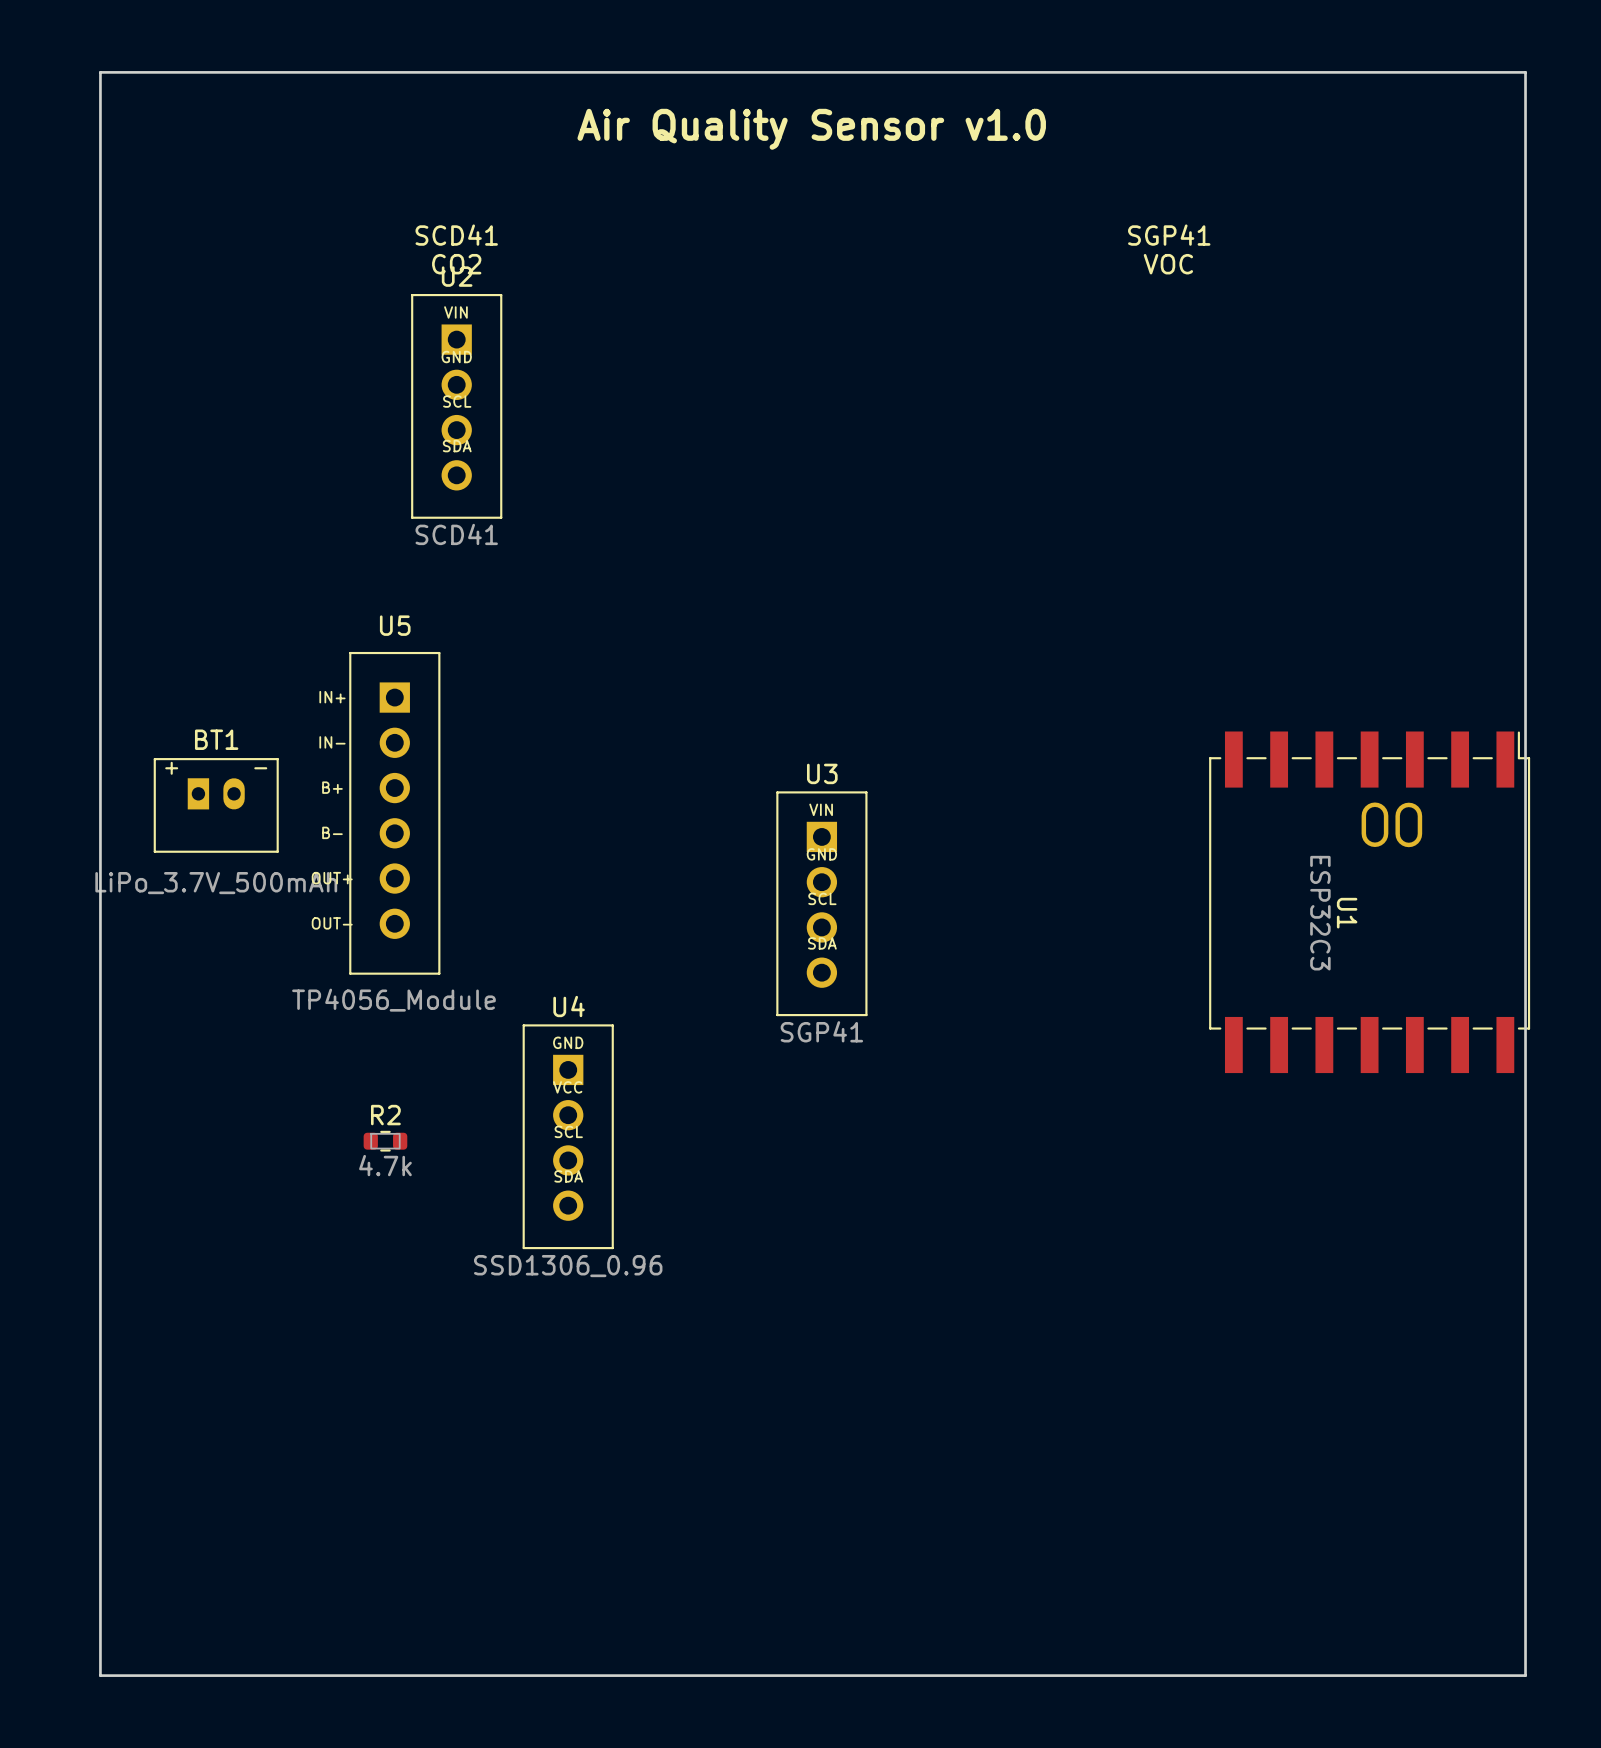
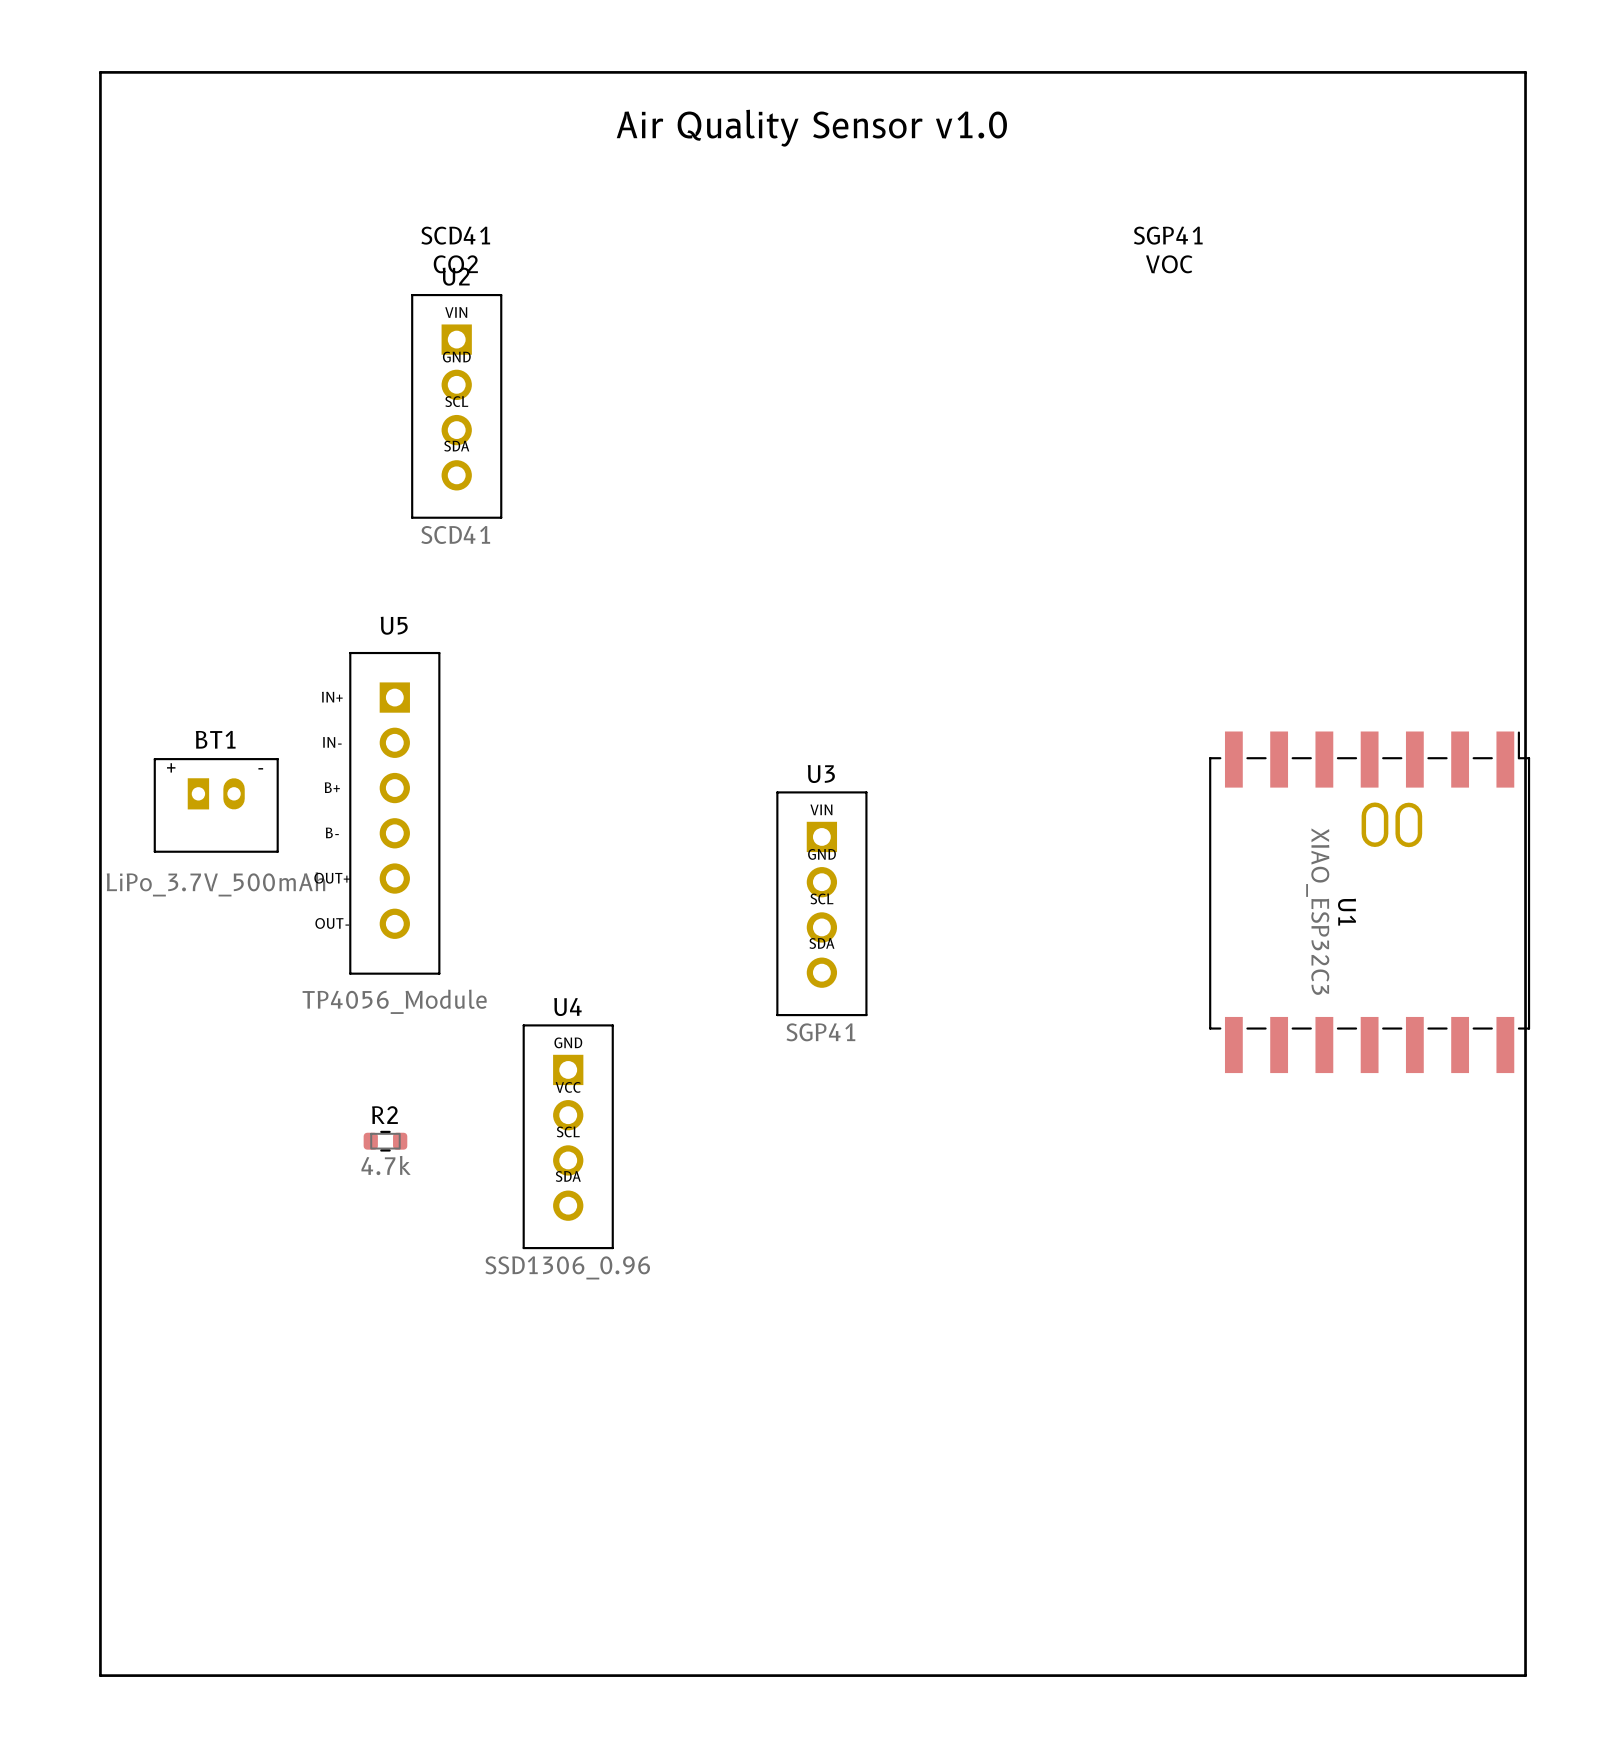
U1 value: ESP32C3 (1320, 913) -> XIAO_ESP32C3 (1317, 911)

